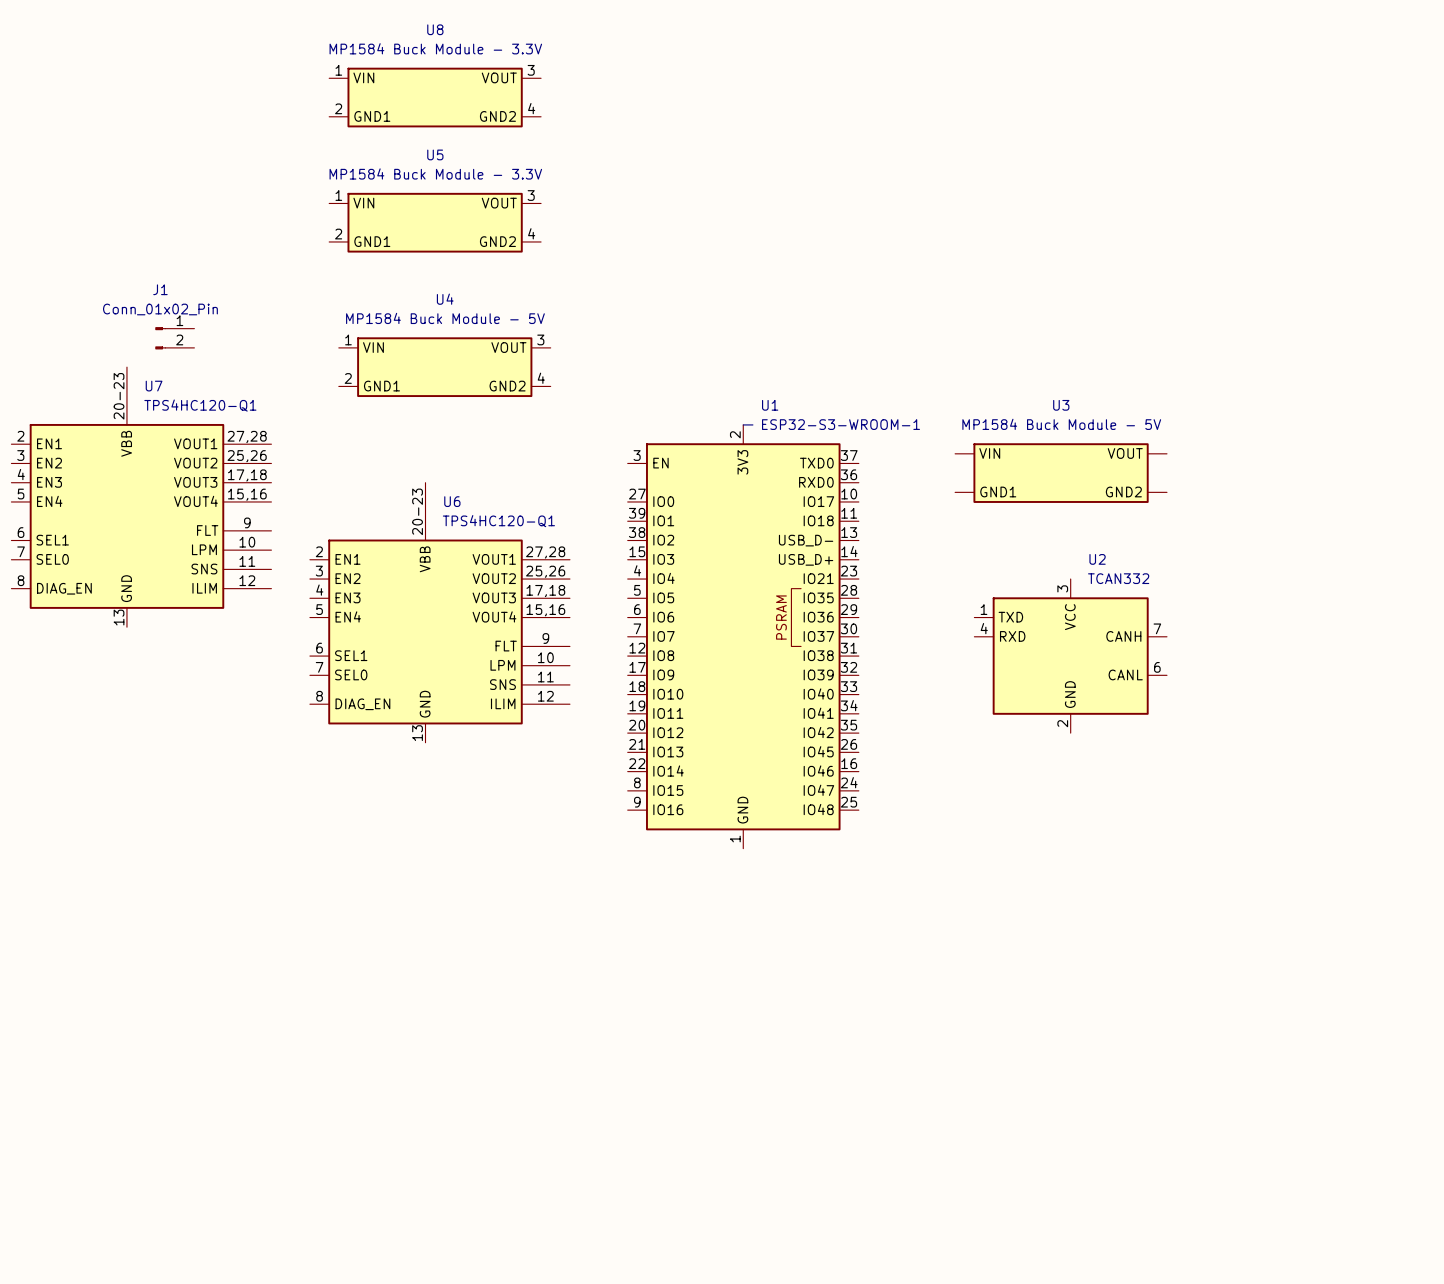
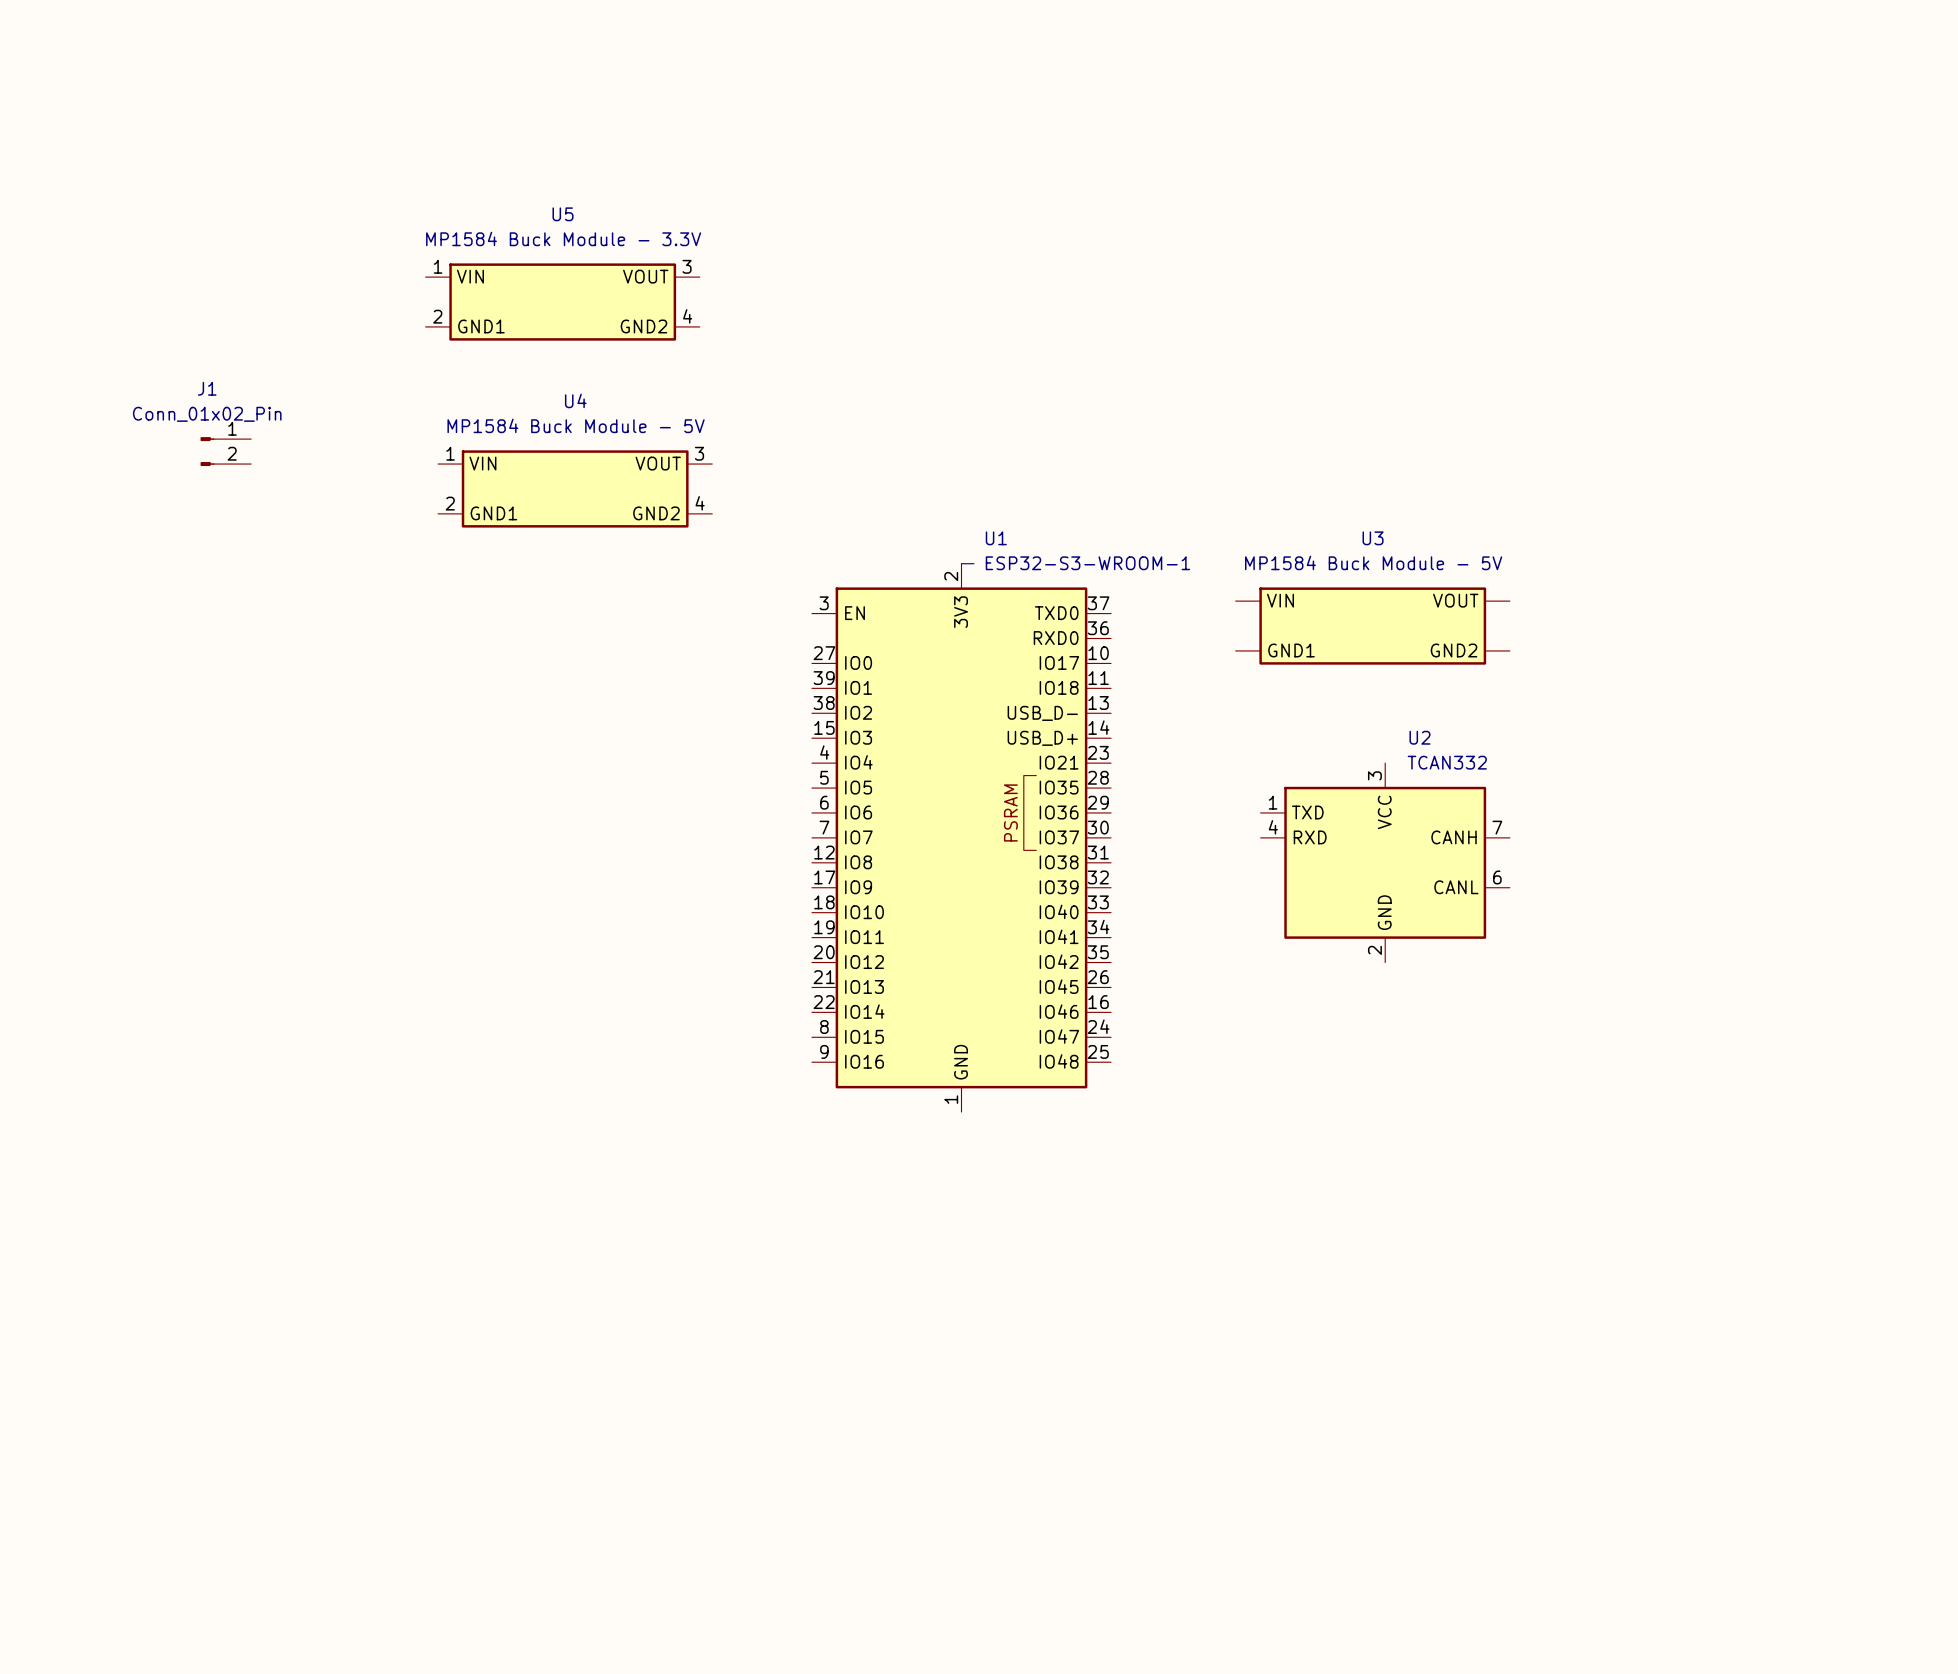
U8: MP1584 Buck Module - 3.3V (435, 97) -> none
U7: TPS4HC120-Q1 (141, 497) -> none
U6: TPS4HC120-Q1 (439, 612) -> none

